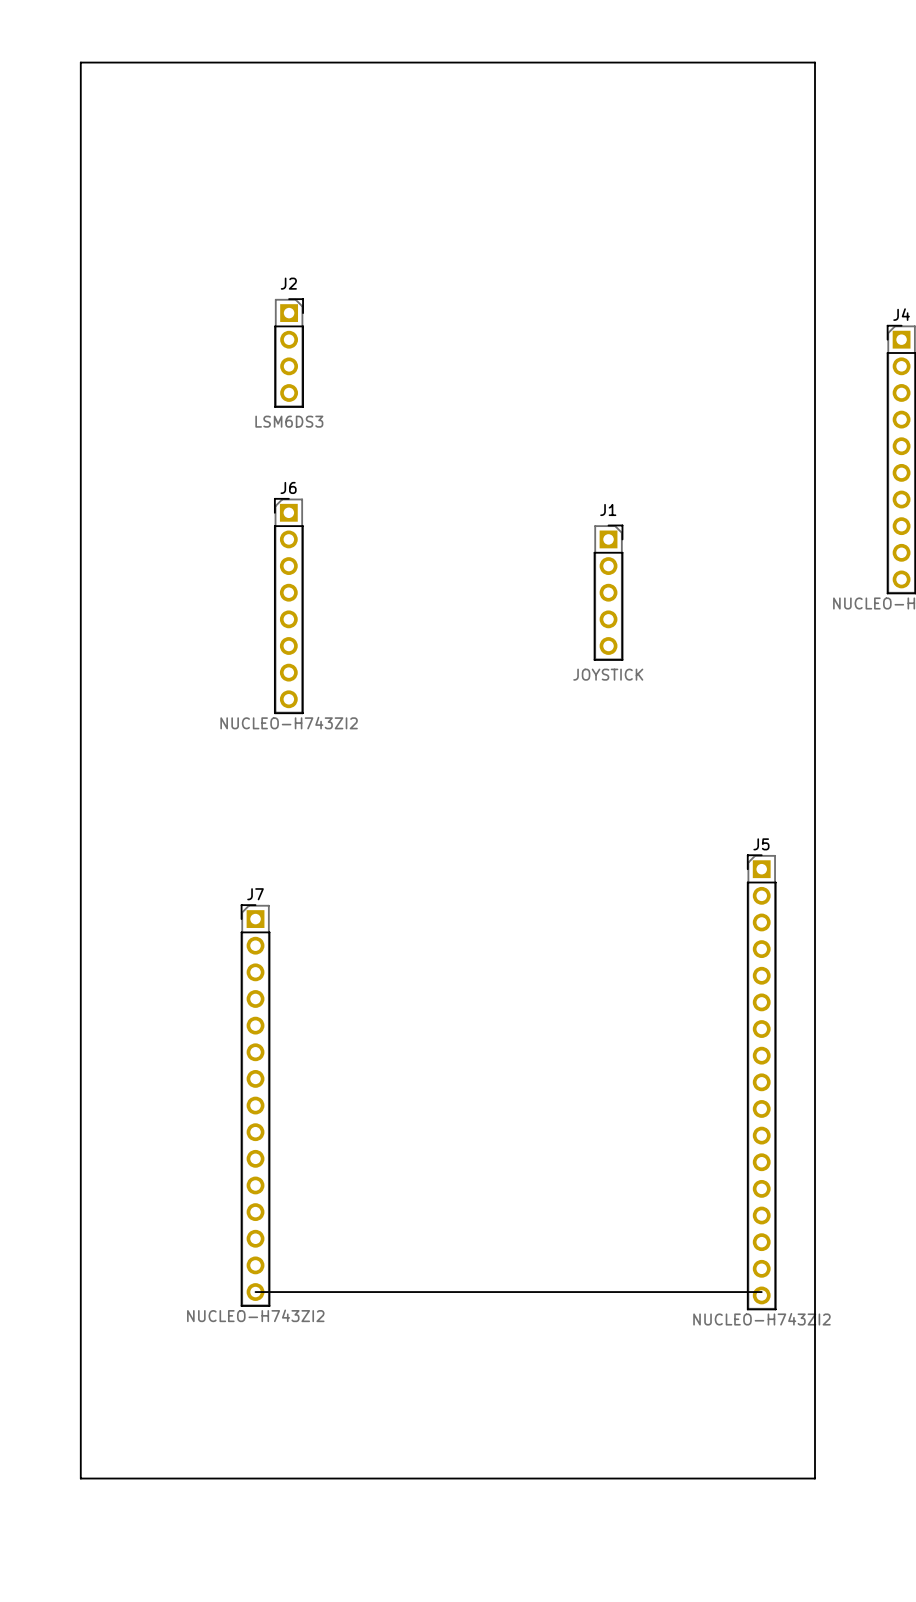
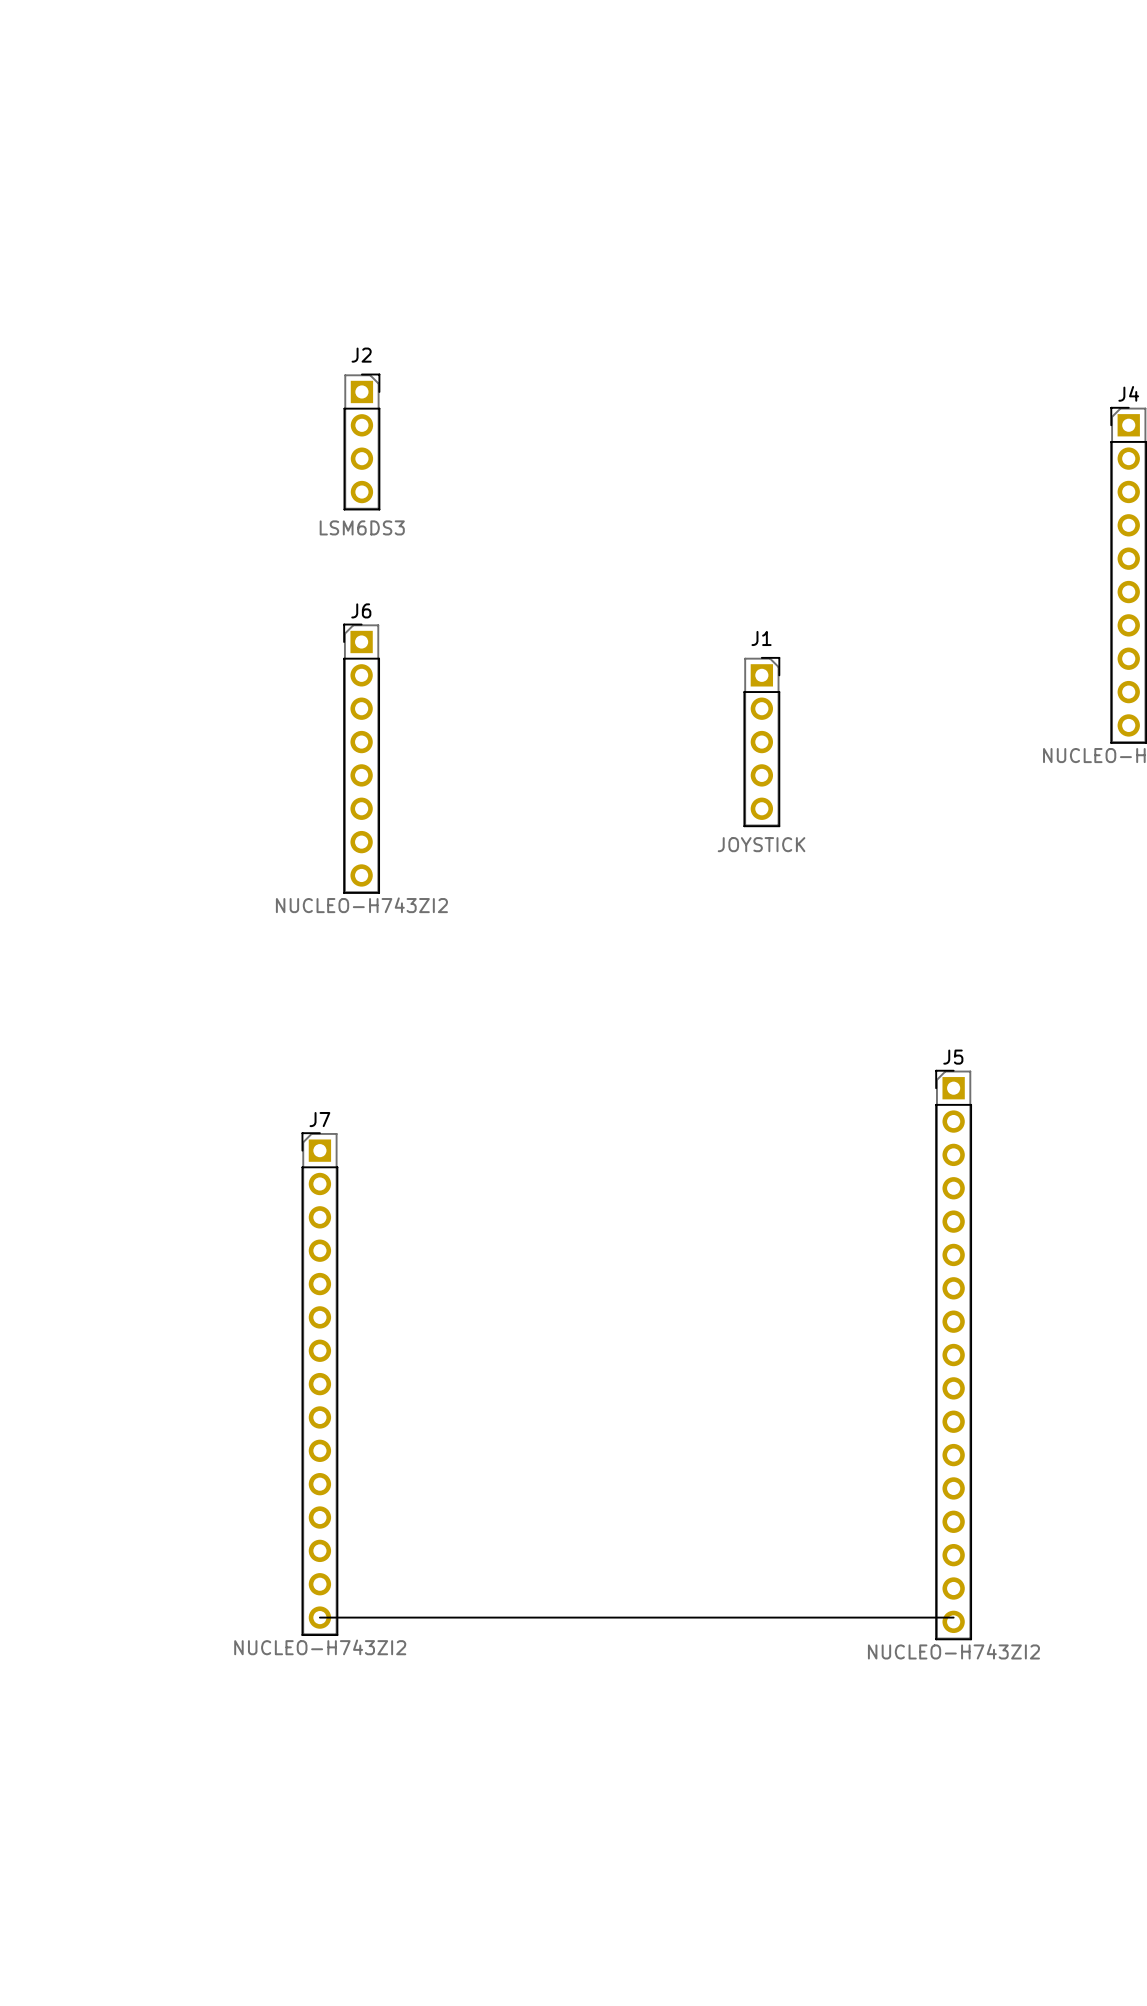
board edge: (80, 62) (814, 62) (814, 1478) (80, 1478) (80, 62) -> none

